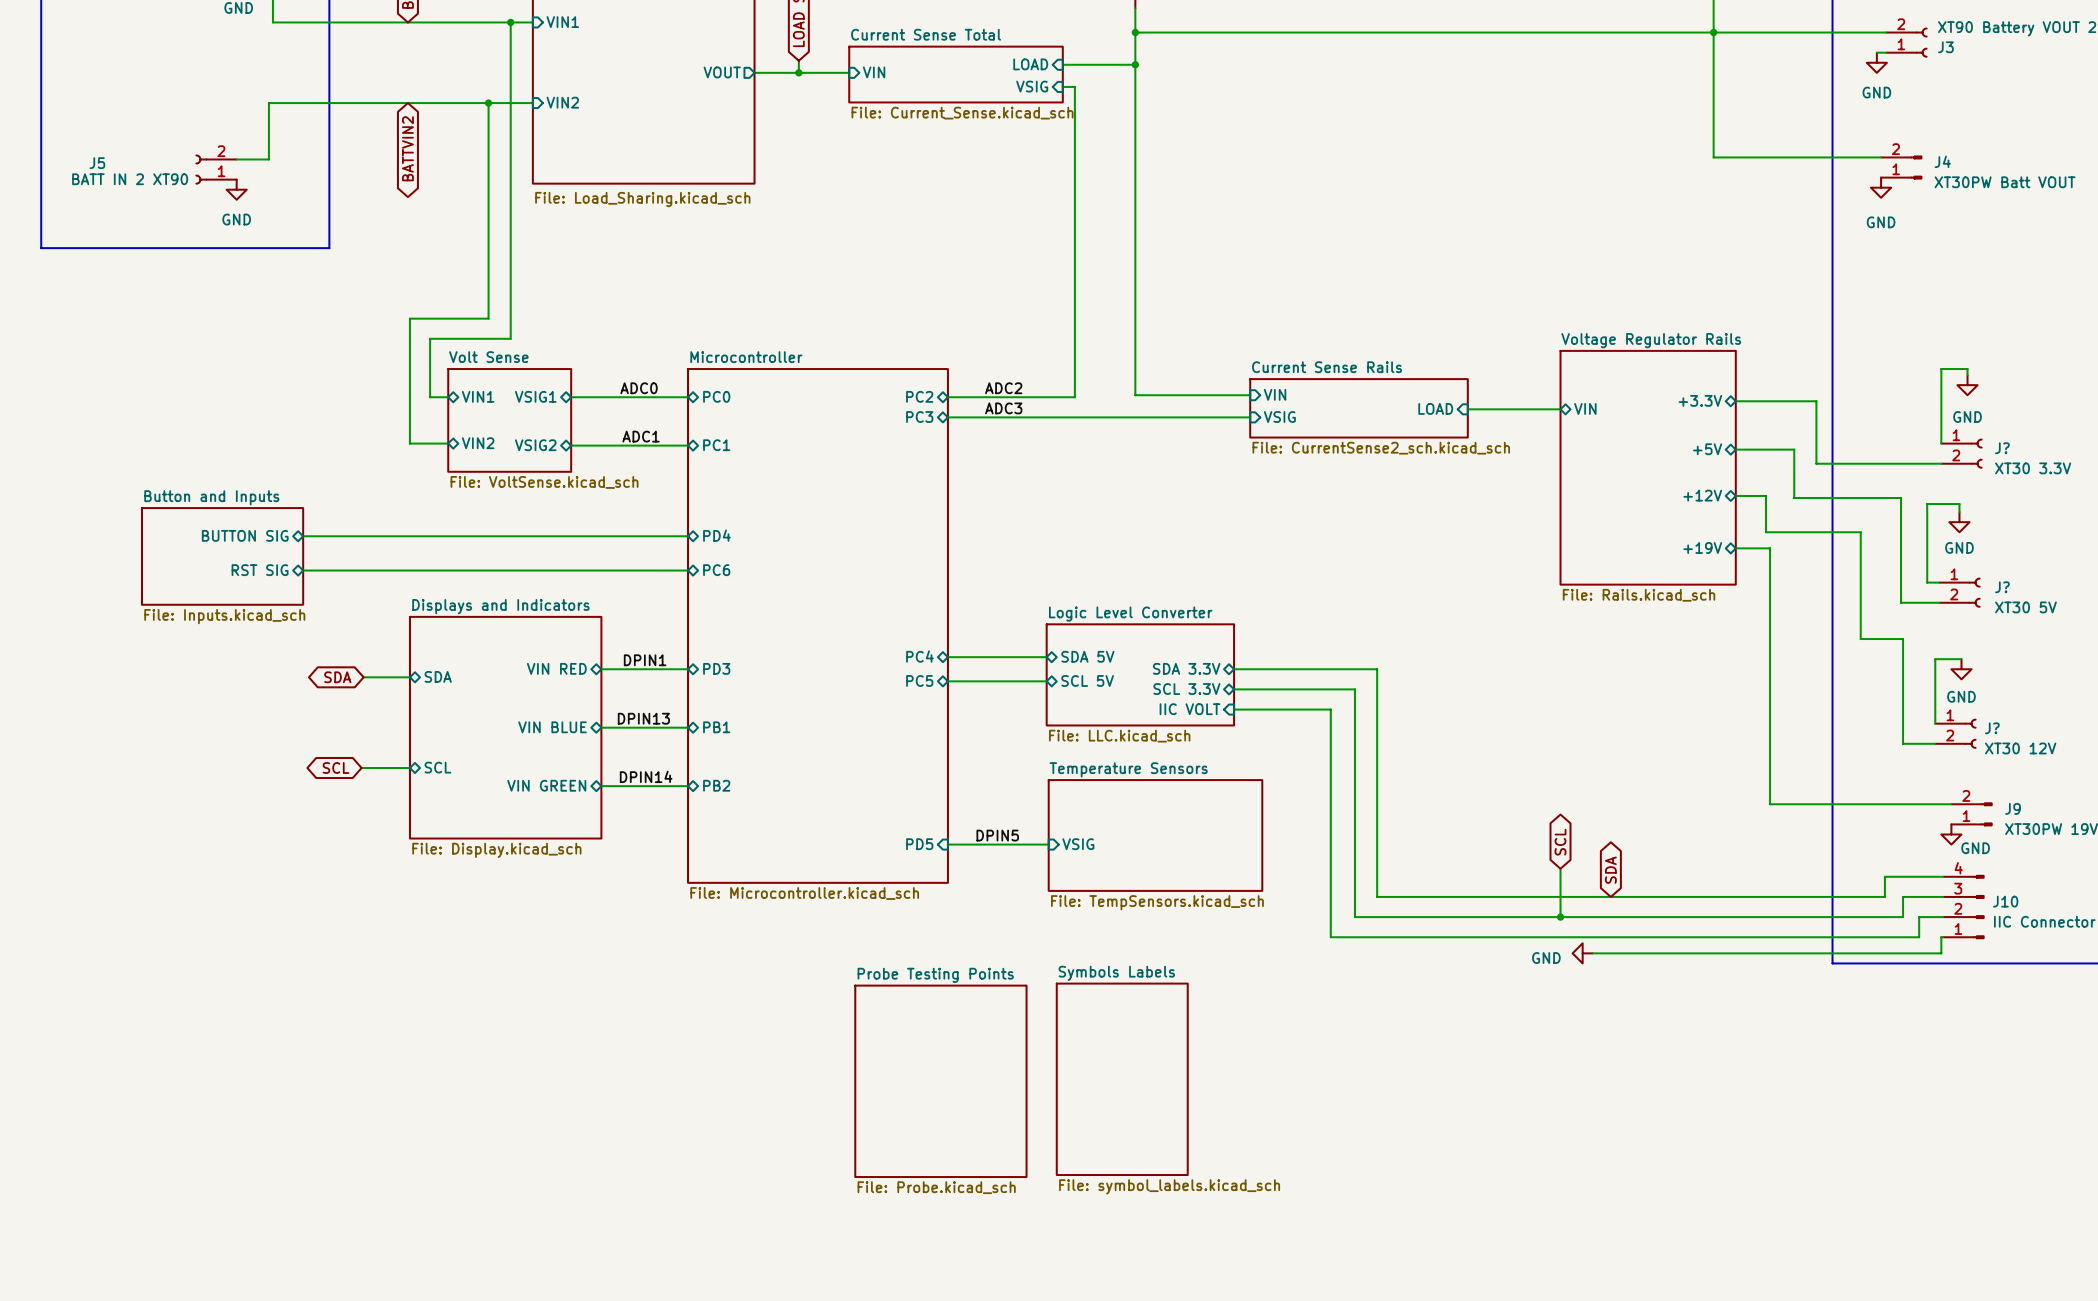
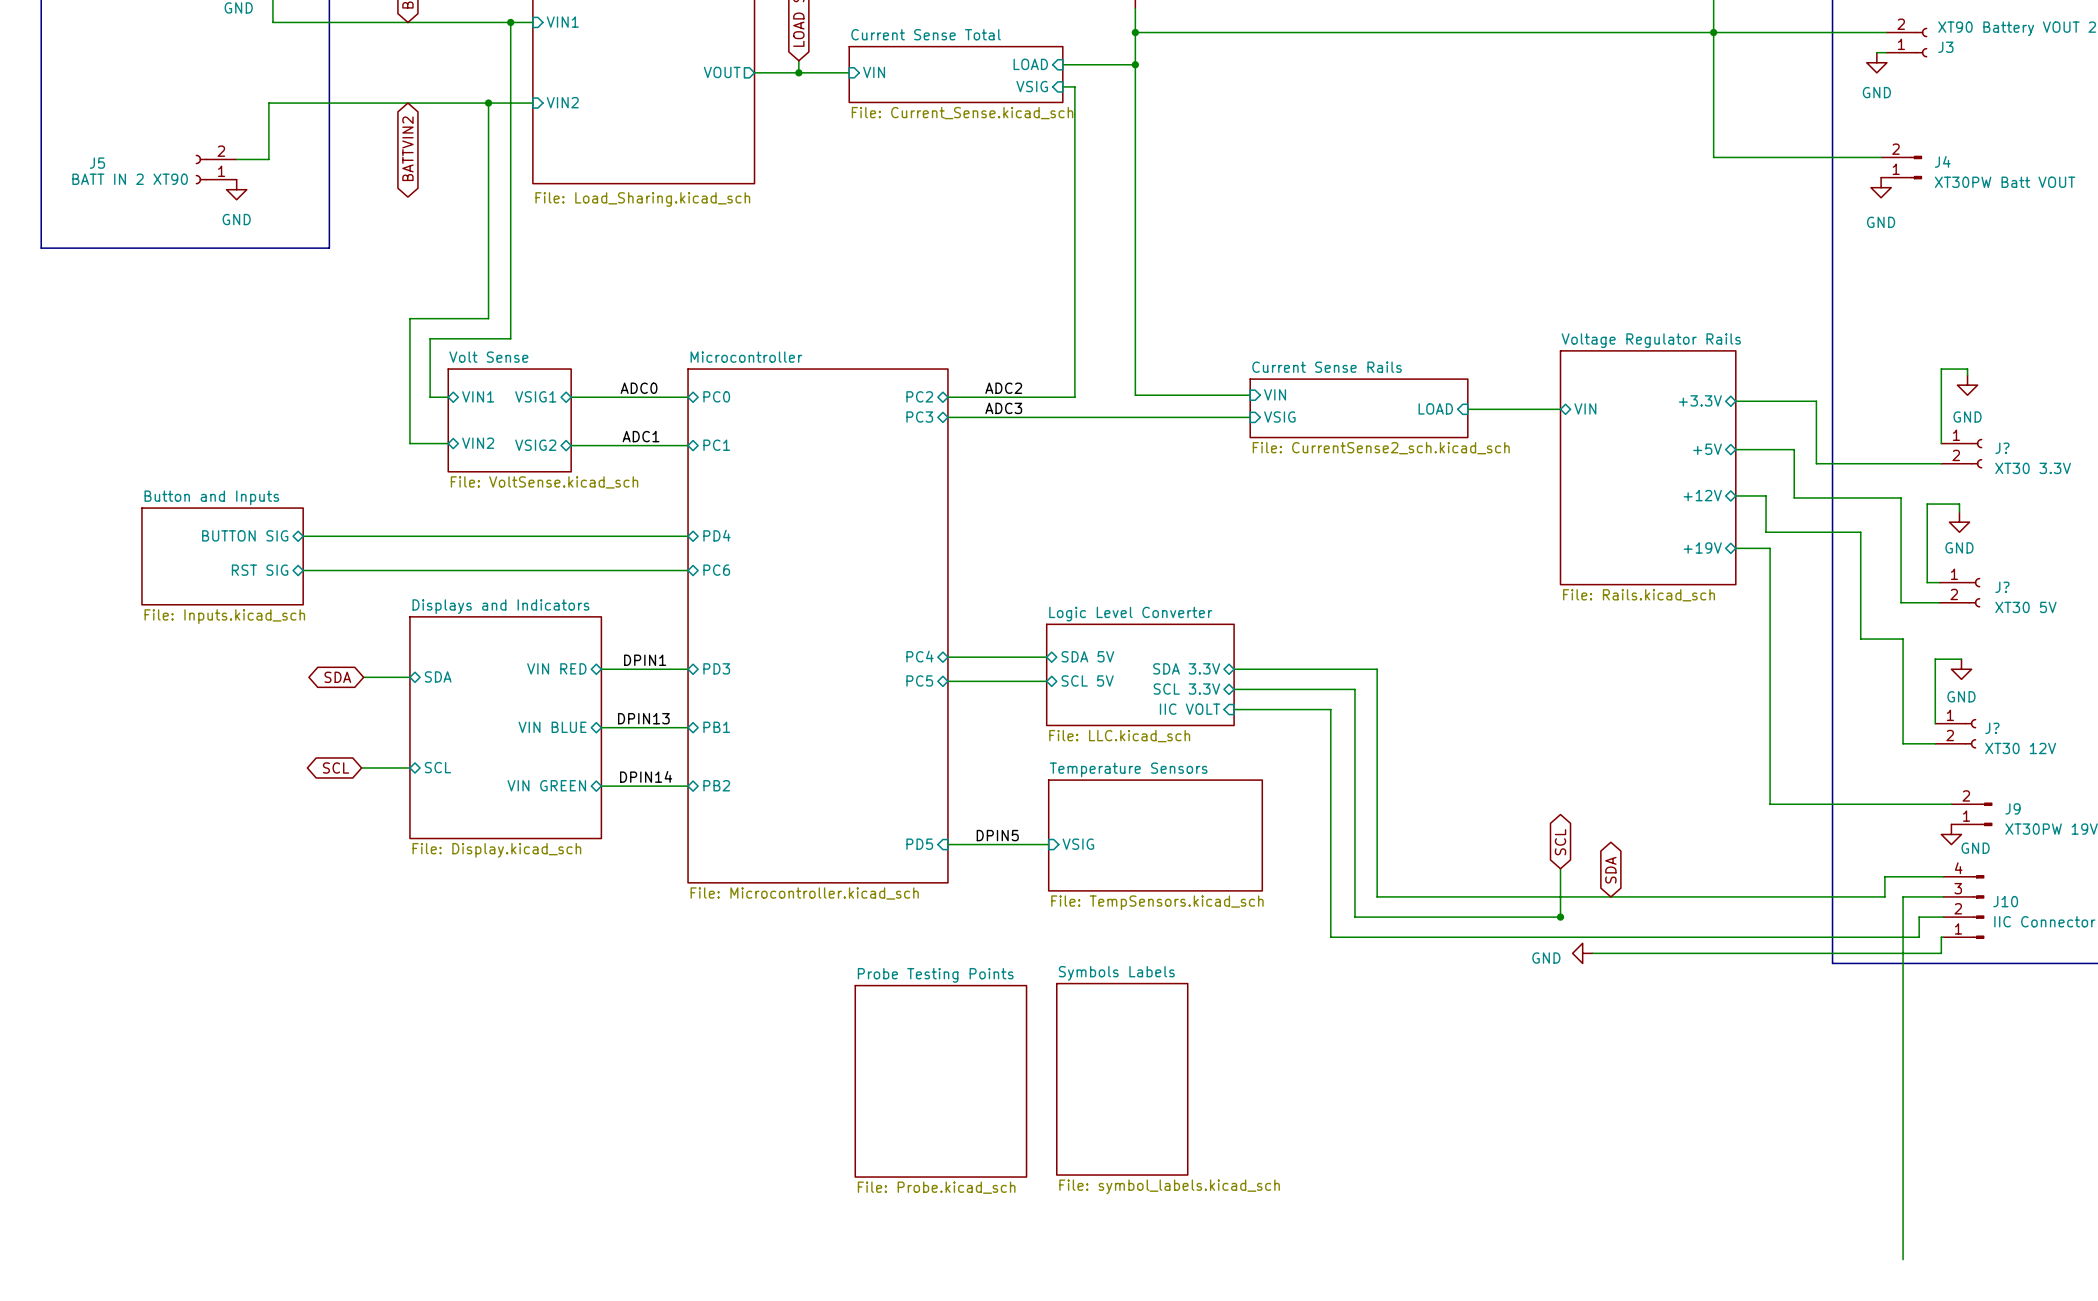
wire: (1560, 917) (1903, 917) -> (1903, 1259) (1903, 917)

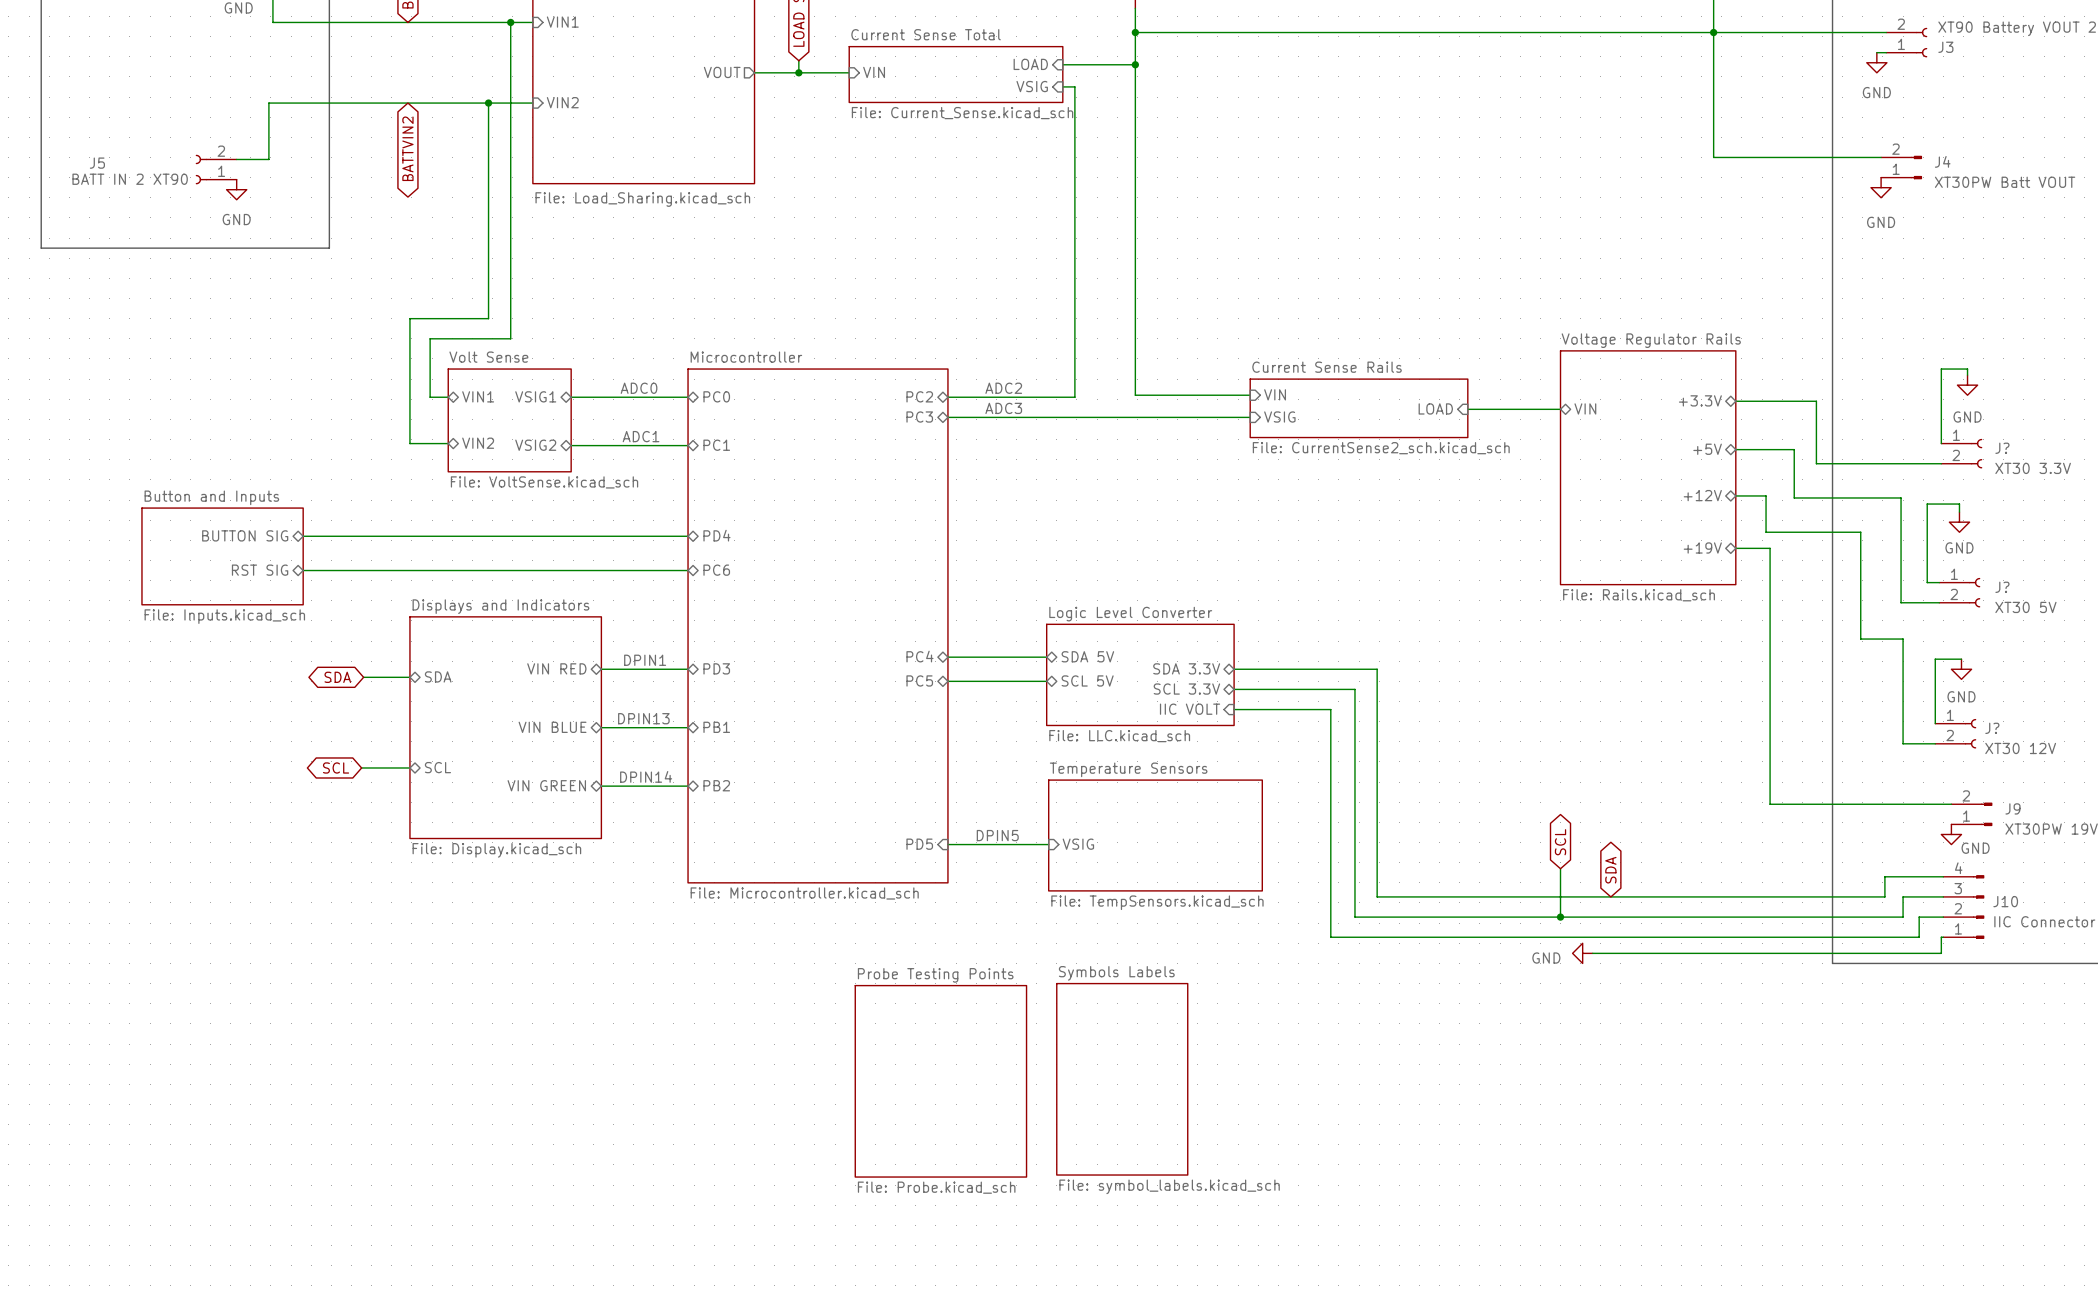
wire: (1903, 917) (1903, 1259) -> (1903, 917) (1560, 917)

